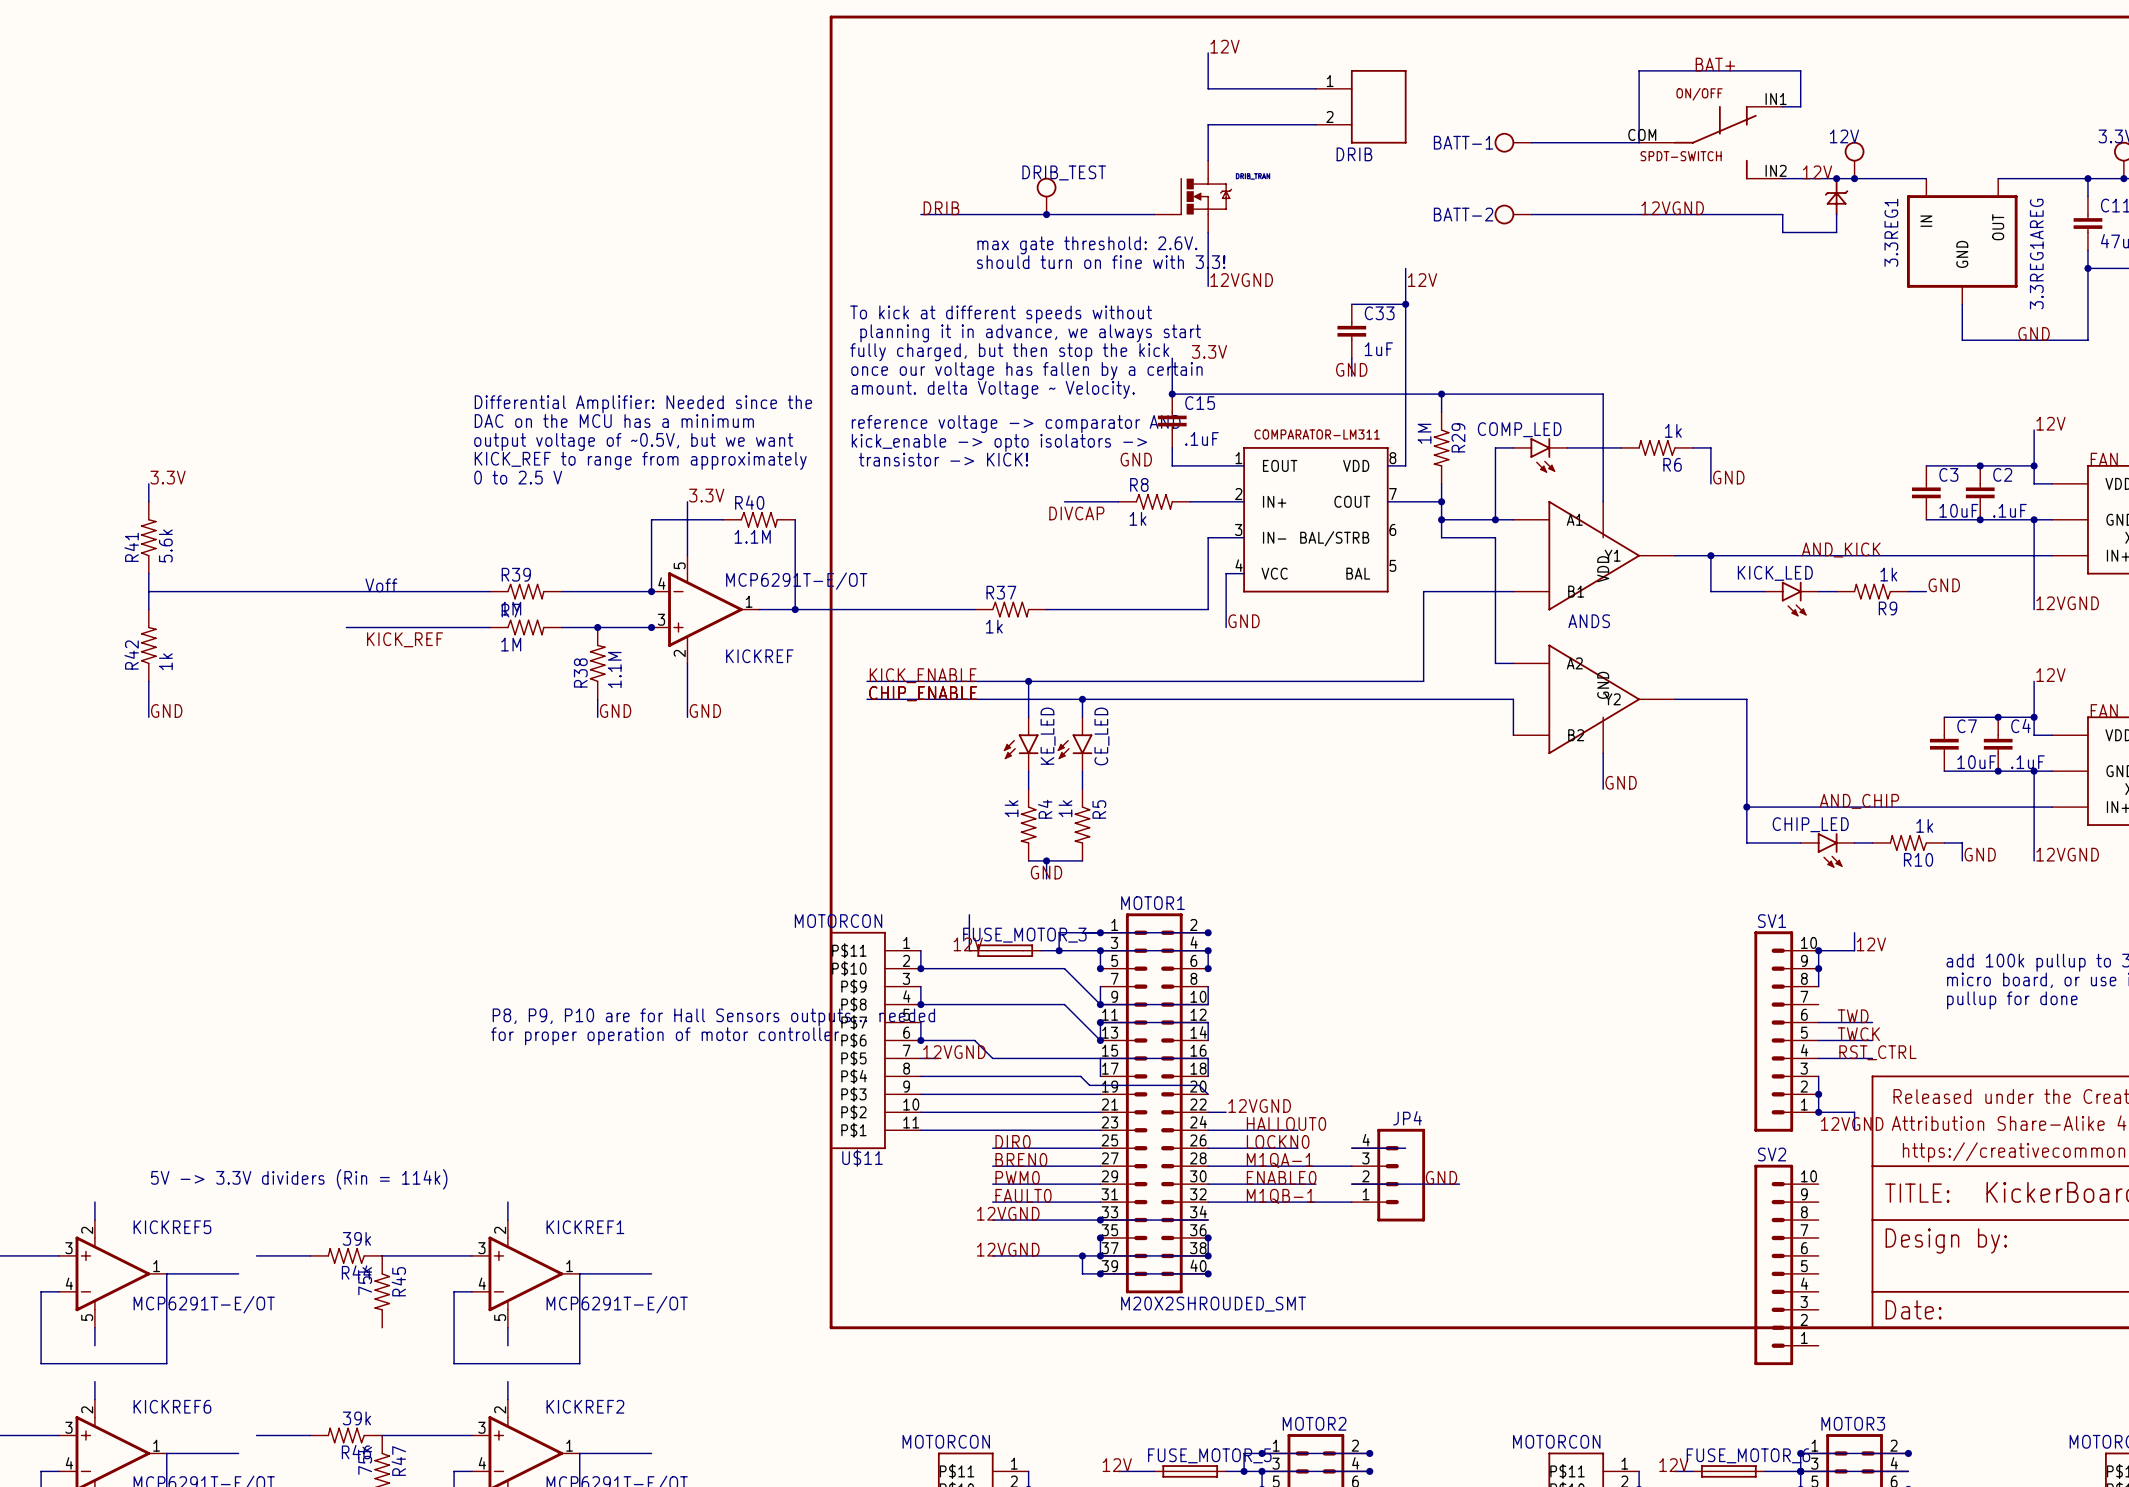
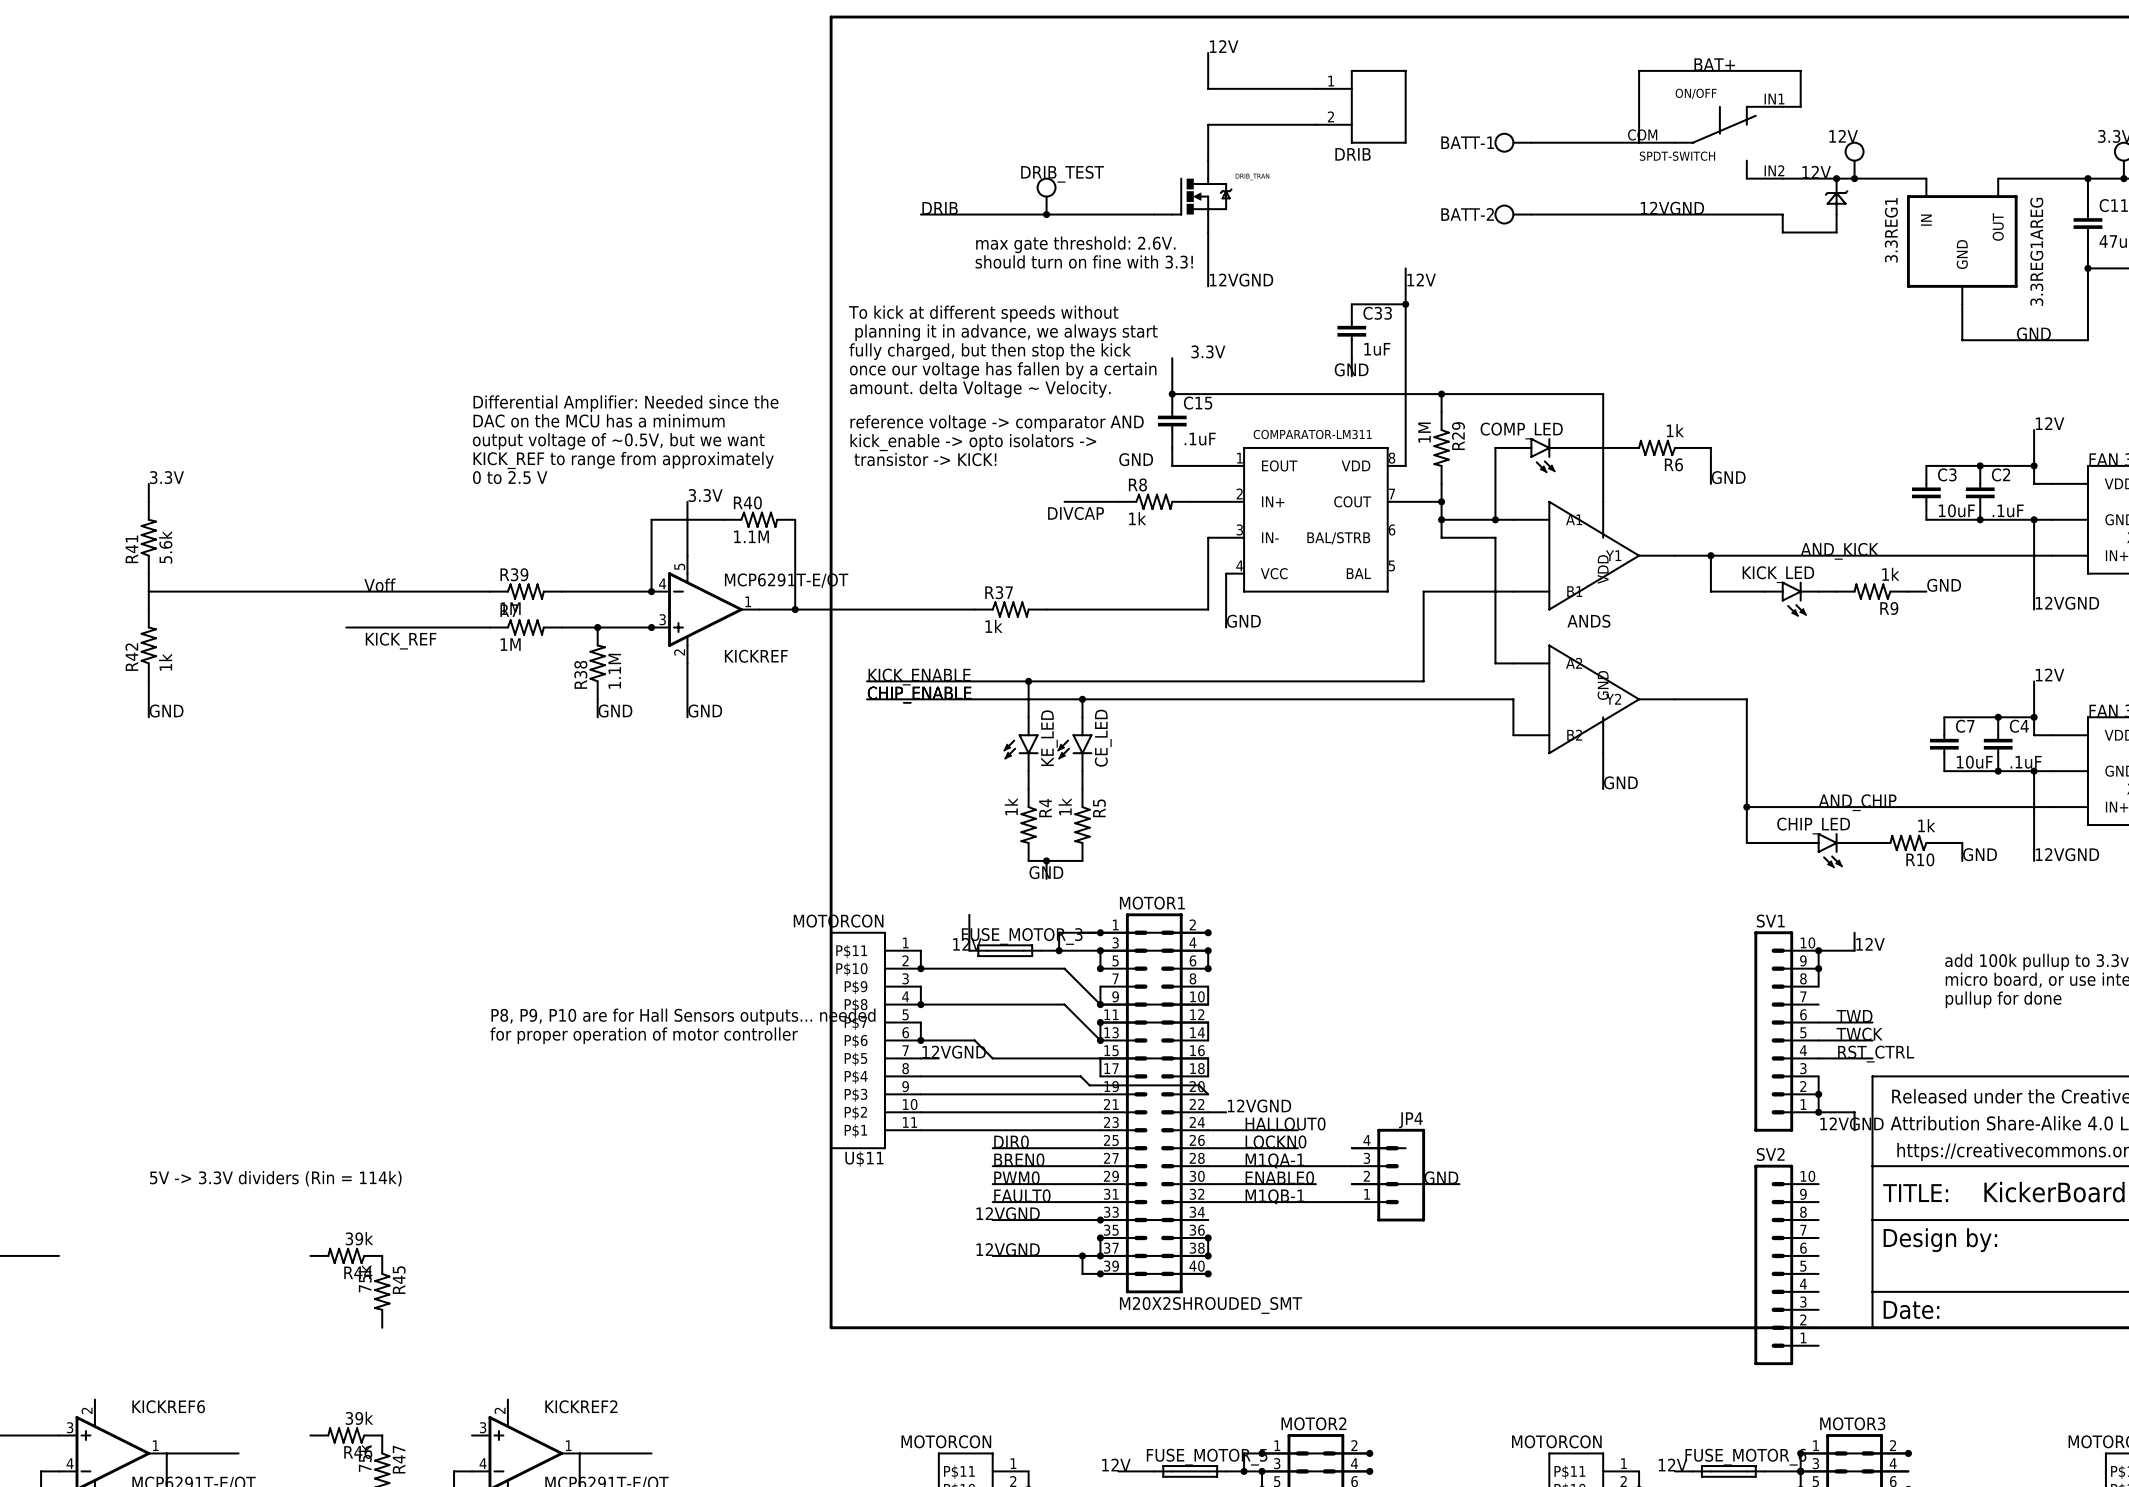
wire: (94, 1202) (94, 1220) -> none
wire: (507, 1202) (507, 1220) -> none
wire: (256, 1255) (310, 1255) -> none
wire: (382, 1255) (472, 1255) -> none
KICKREF5: MCP6291T-E/OT (112, 1273) -> none
wire: (238, 1273) (166, 1273) (166, 1363) (41, 1363) (41, 1291) (59, 1291) -> none
KICKREF1: MCP6291T-E/OT (525, 1273) -> none
wire: (651, 1273) (579, 1273) (579, 1363) (454, 1363) (454, 1291) (472, 1291) -> none
wire: (94, 1327) (94, 1345) -> none
wire: (507, 1327) (507, 1345) -> none
wire: (94, 1381) (94, 1399) -> none
wire: (507, 1381) (507, 1399) -> none
wire: (256, 1435) (310, 1435) -> none
wire: (382, 1435) (472, 1435) -> none

